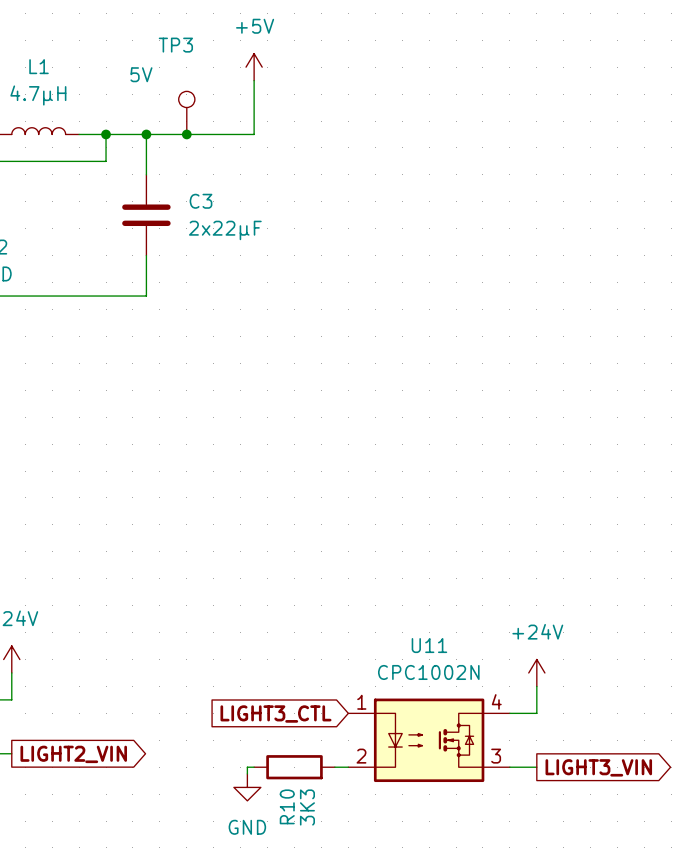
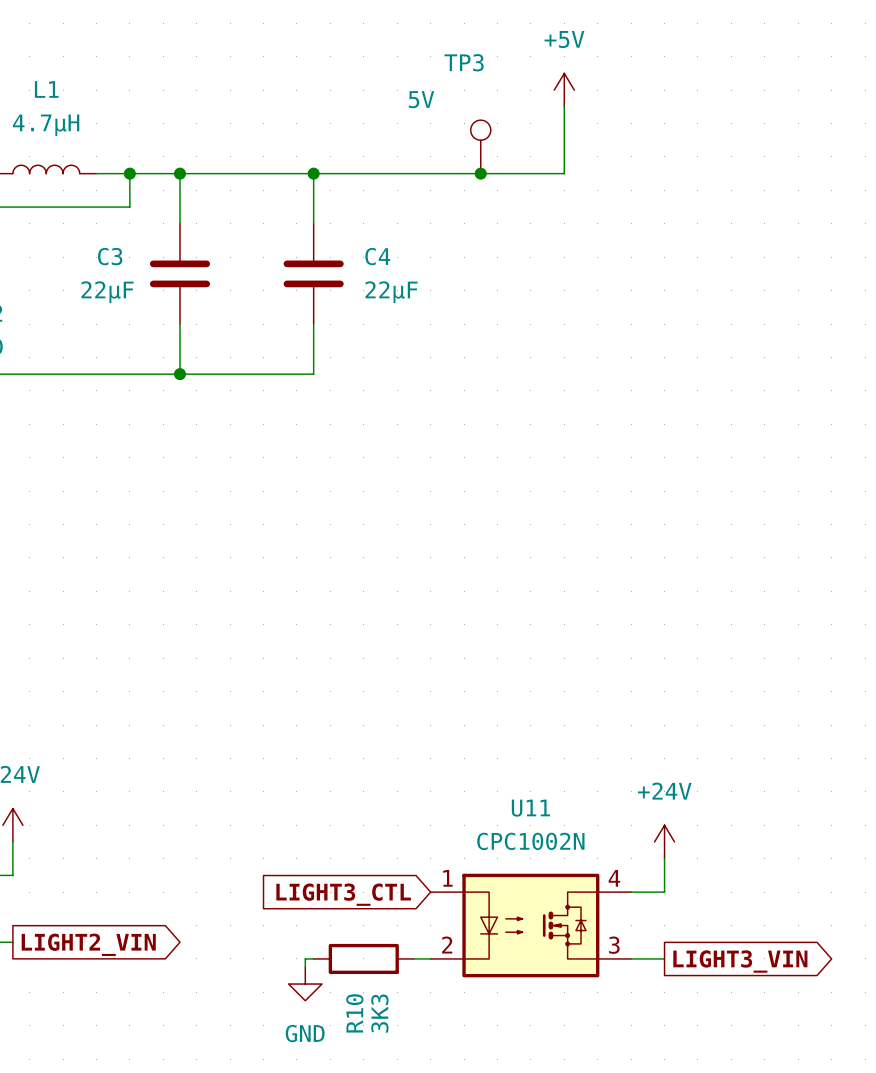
power symbol position: +5V (254, 67) -> +5V (564, 90)
wire: (254, 80) (254, 134) -> none
wire: none -> (564, 106) (564, 173) (313, 173) (313, 223)
TP3 position: (186, 112) -> (480, 146)
junction: (186, 134) -> none
junction: none -> (313, 173)
junction: none -> (480, 173)
C3 name position: C3 (201, 201) -> C3 (110, 256)
C4: none -> 22µF (313, 273)
C3 value: 2x22µF (225, 230) -> 22µF (107, 292)
wire: none -> (313, 324) (313, 374) (179, 374)
junction: none -> (179, 374)

